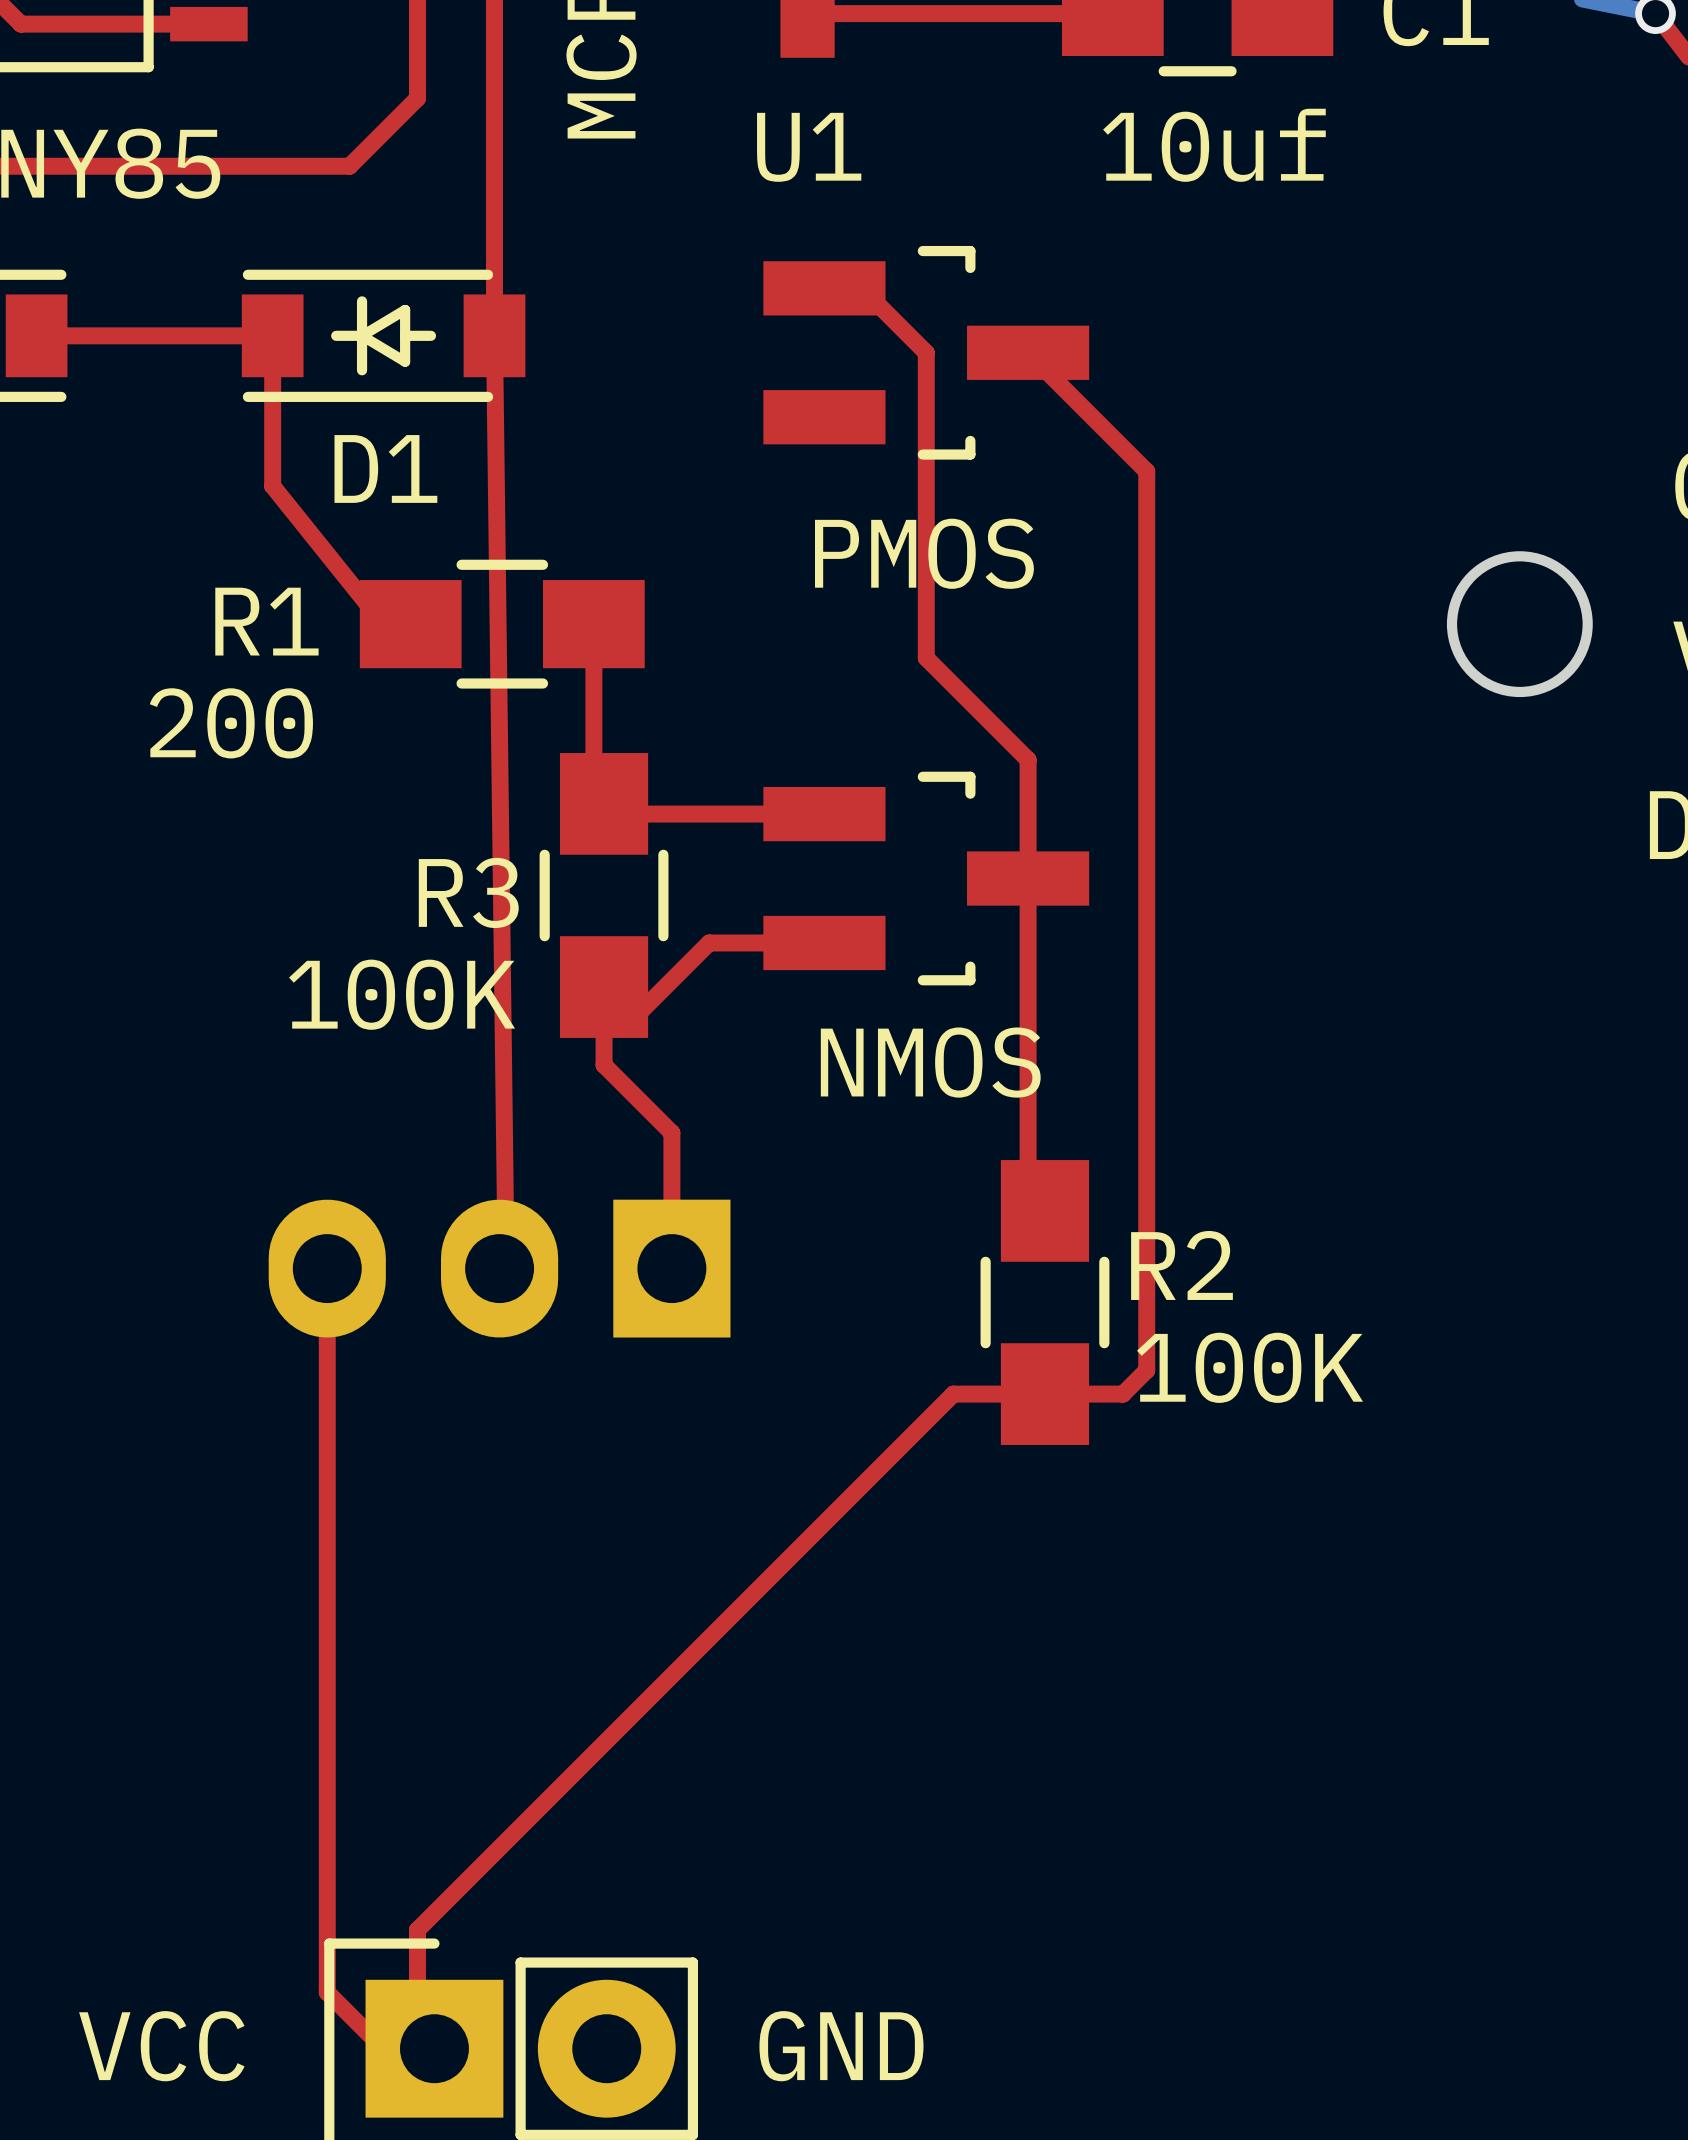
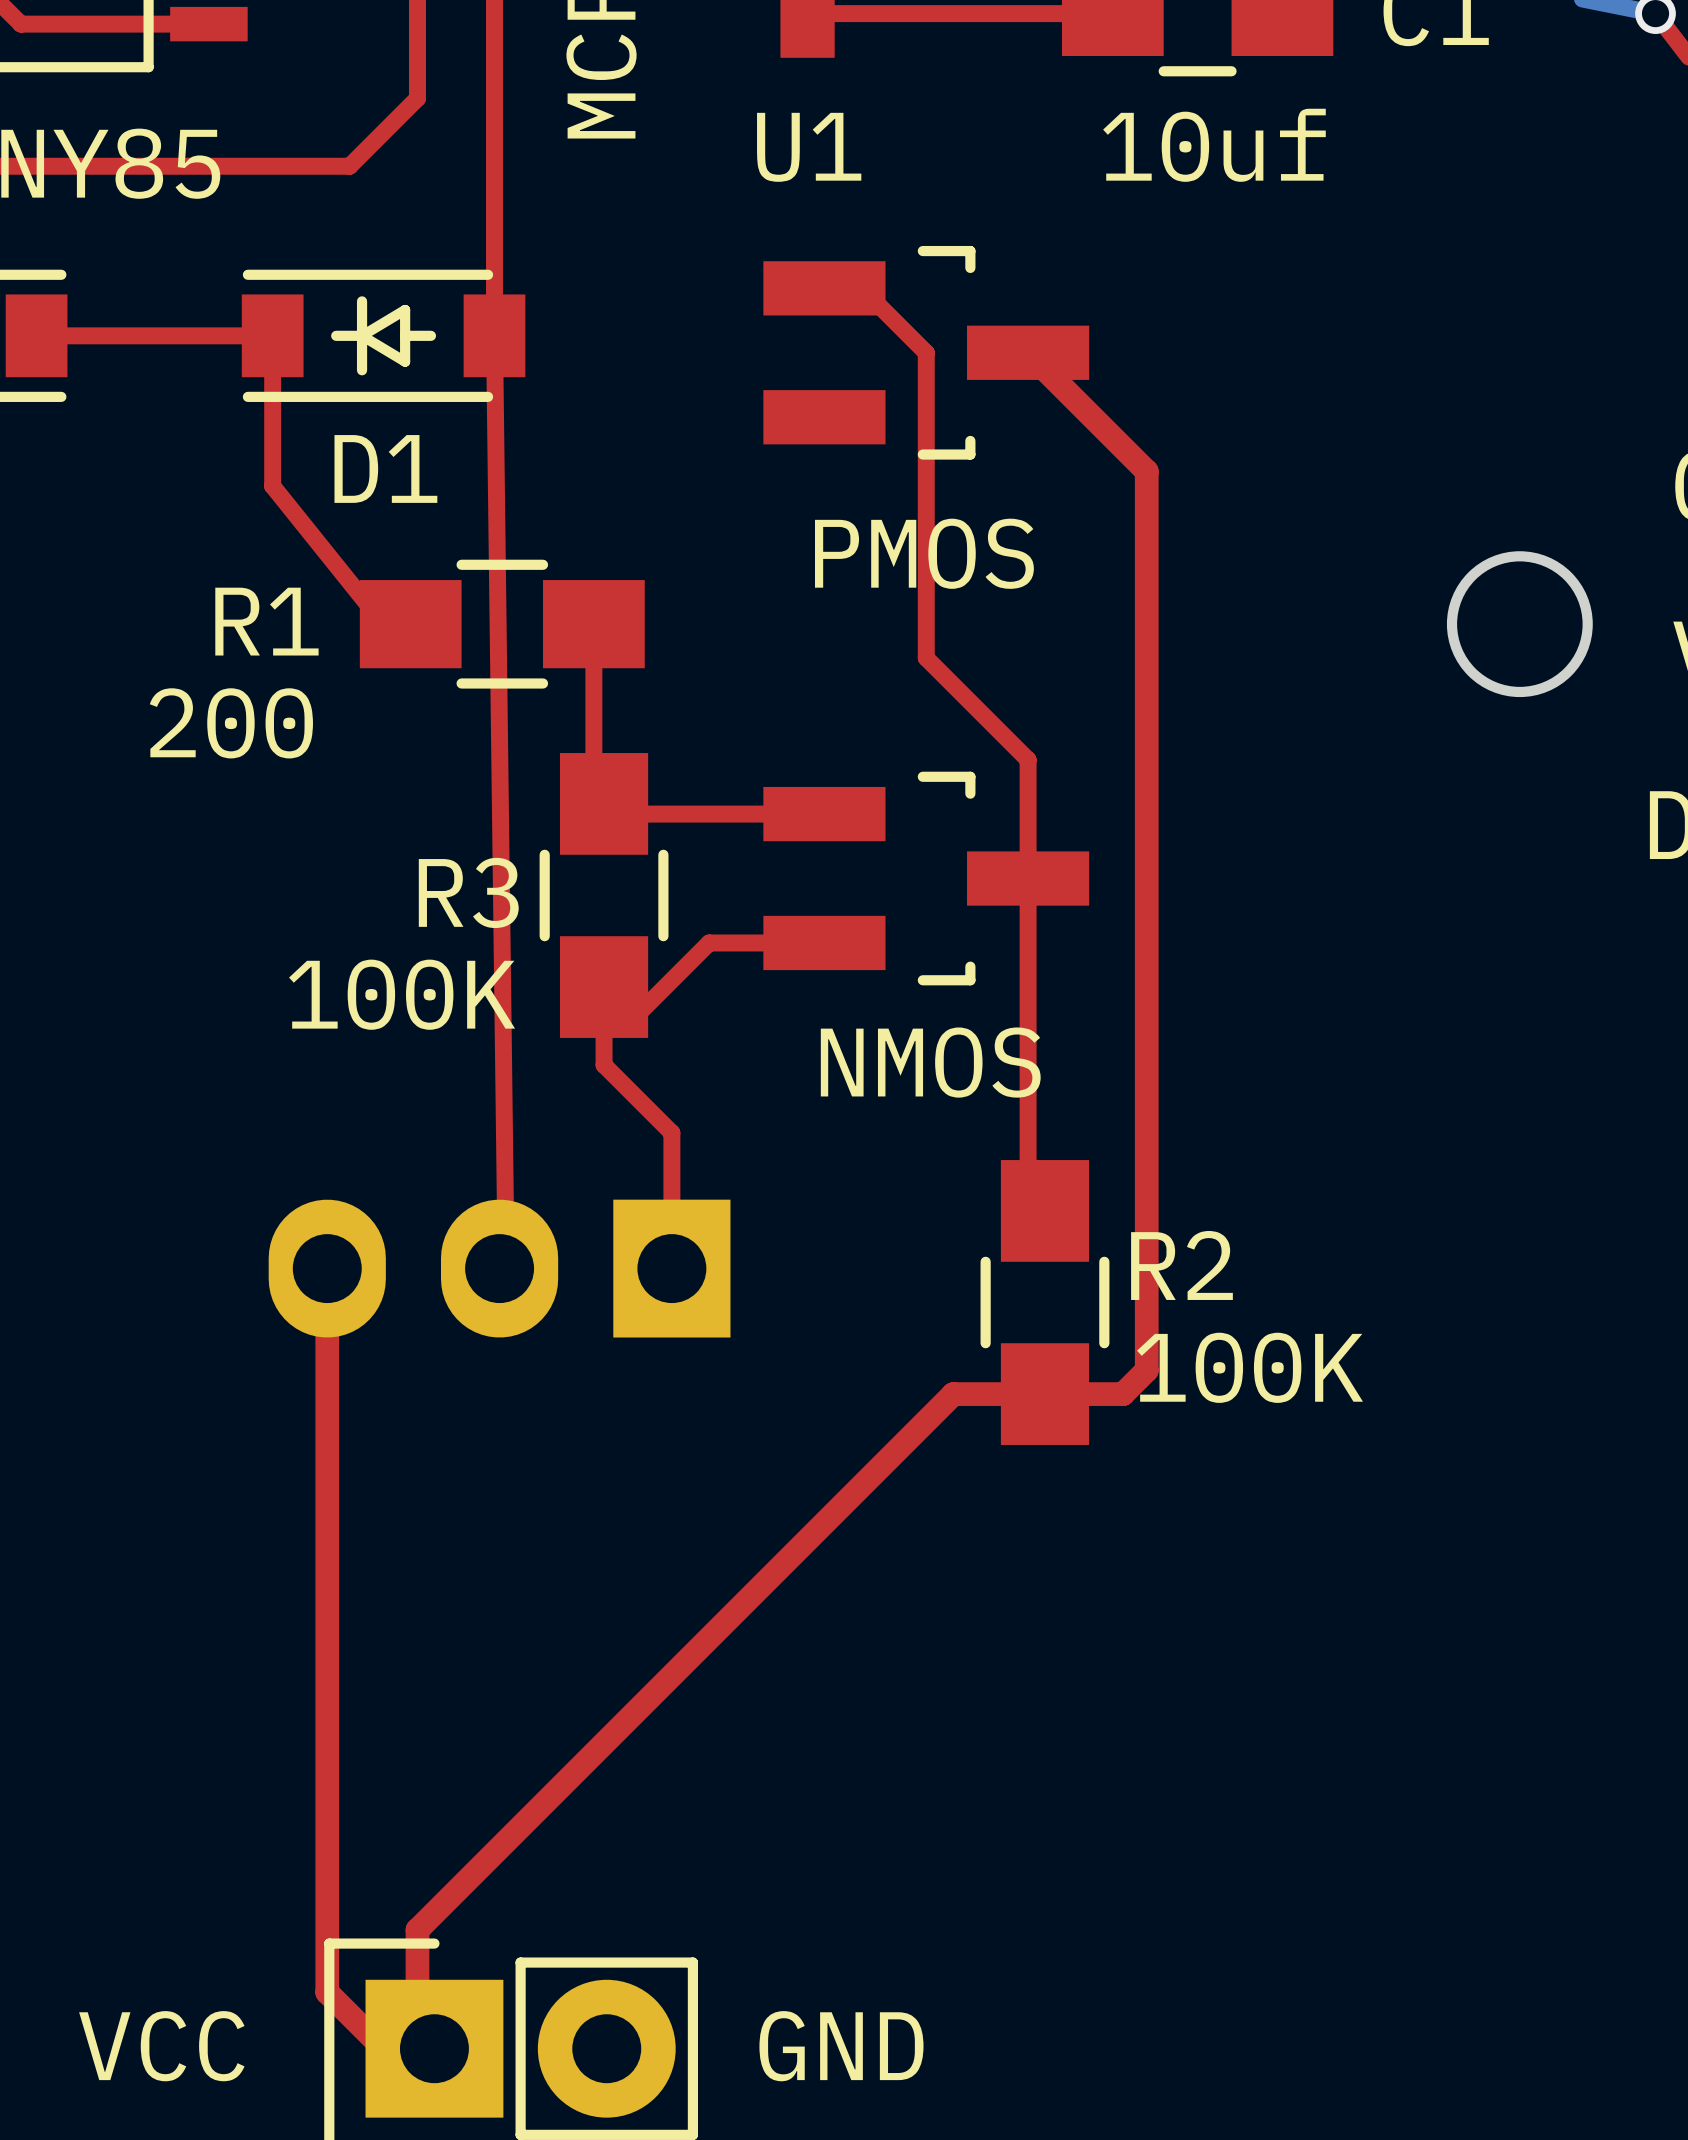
top track width: thin (1028, 352) (1146, 471) (1146, 1370) (1123, 1394) (953, 1394) (417, 1930) (417, 2082) (327, 1992) (327, 1268) -> thick (1028, 352) (1146, 471) (1146, 1370) (1123, 1394) (953, 1394) (417, 1930) (417, 2082) (327, 1992) (327, 1268)

